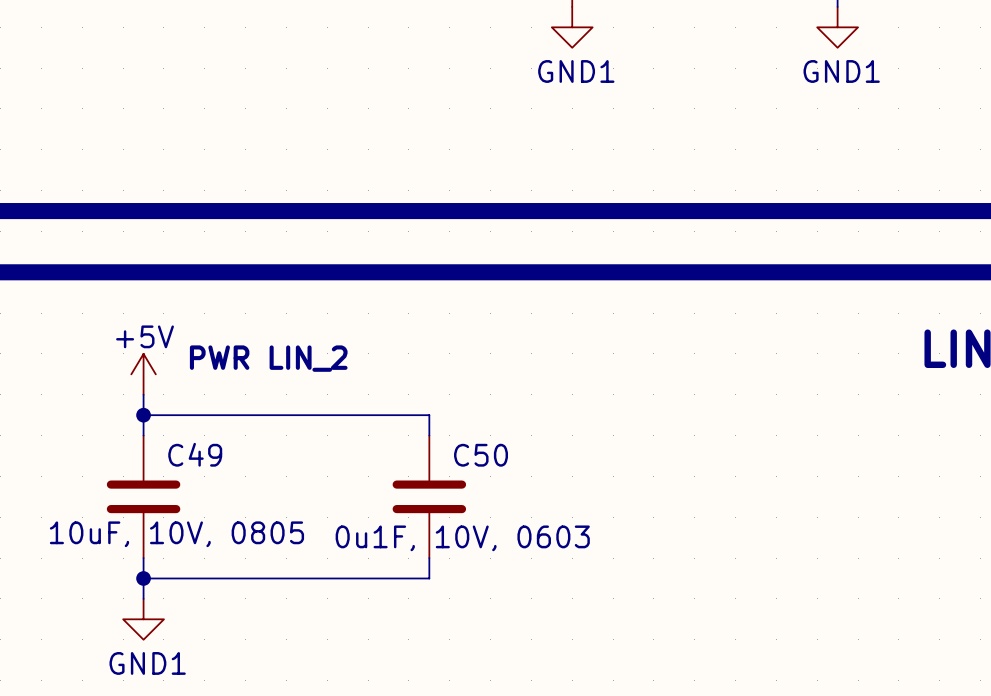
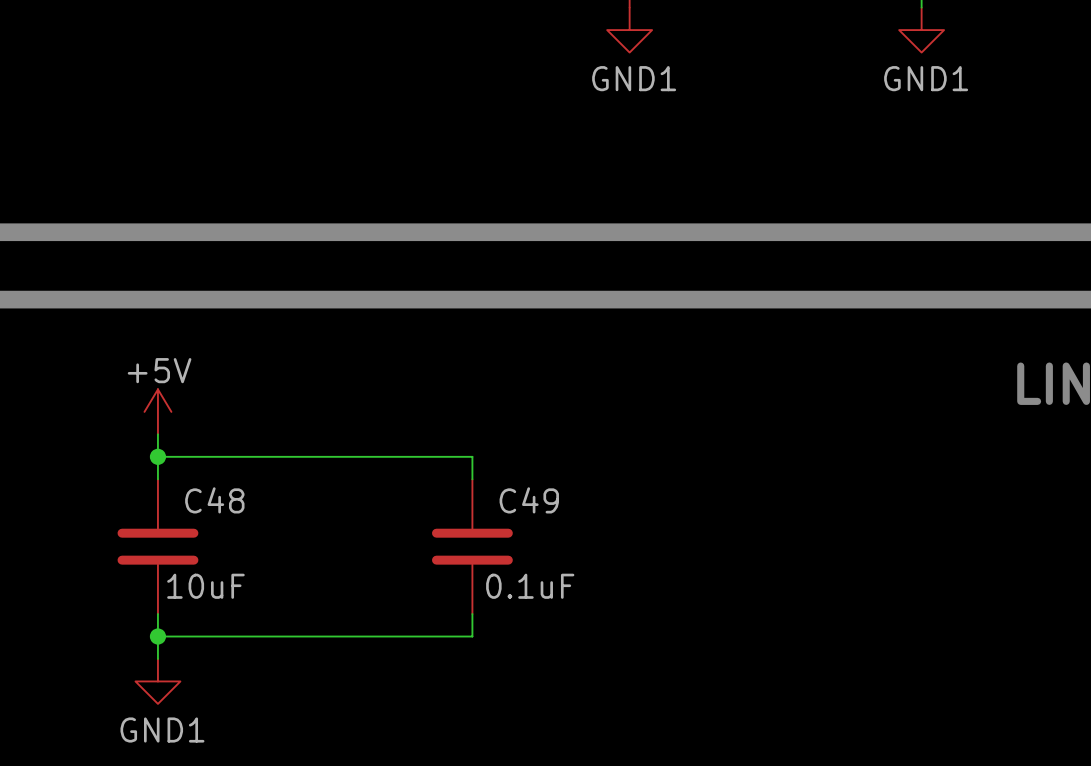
text: PWR LIN_2 (268, 358) -> none
C49 name: C49 (195, 454) -> C48 (214, 500)
C50 name: C50 (481, 455) -> C49 (529, 500)
C49 value: 10uF, 10V, 0805 (176, 534) -> 10uF (205, 586)
C50 value: 0u1F, 10V, 0603 (462, 538) -> 0.1uF (530, 586)

